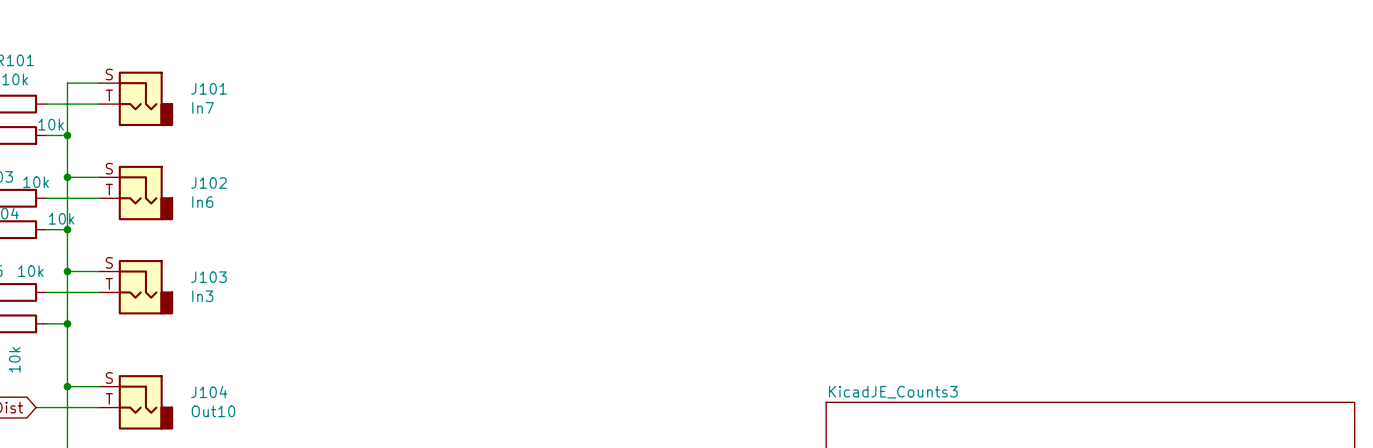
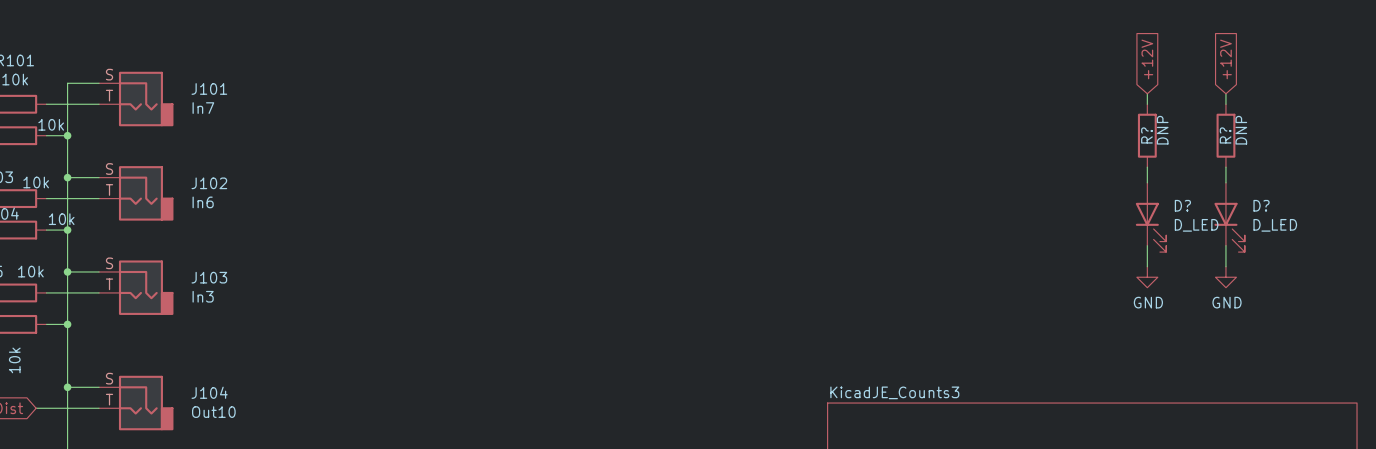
global label: none -> +12V (1147, 59)
global label: none -> +12V (1225, 59)
wire: none -> (1147, 93) (1147, 104)
wire: none -> (1225, 93) (1225, 104)
R?: none -> DNP (1147, 135)
R?: none -> DNP (1225, 135)
wire: none -> (1147, 167) (1147, 182)
wire: none -> (1225, 167) (1225, 182)
D?: none -> D_LED (1151, 217)
D?: none -> D_LED (1229, 217)
wire: none -> (1147, 245) (1147, 266)
wire: none -> (1225, 245) (1225, 266)
power symbol: none -> GND (1147, 277)
power symbol: none -> GND (1225, 277)

